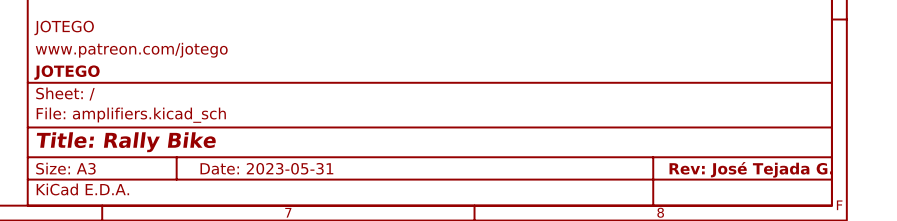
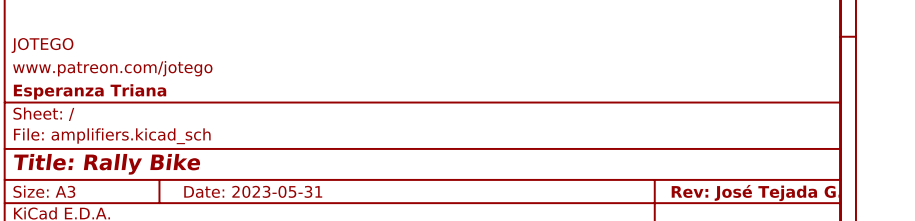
title block: JOTEGO (66, 72) -> Esperanza Triana (90, 91)

